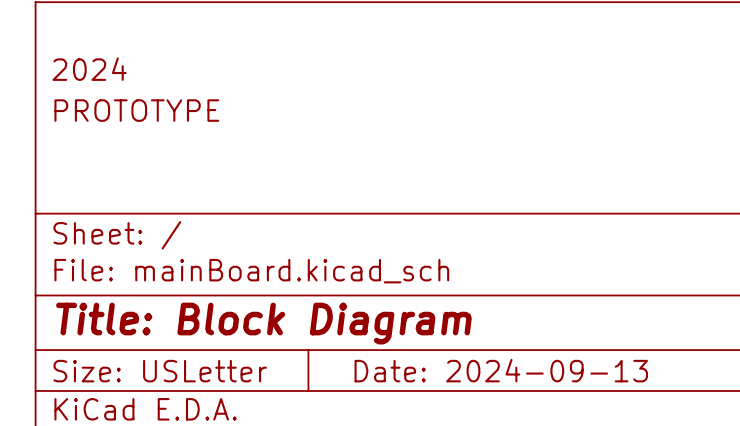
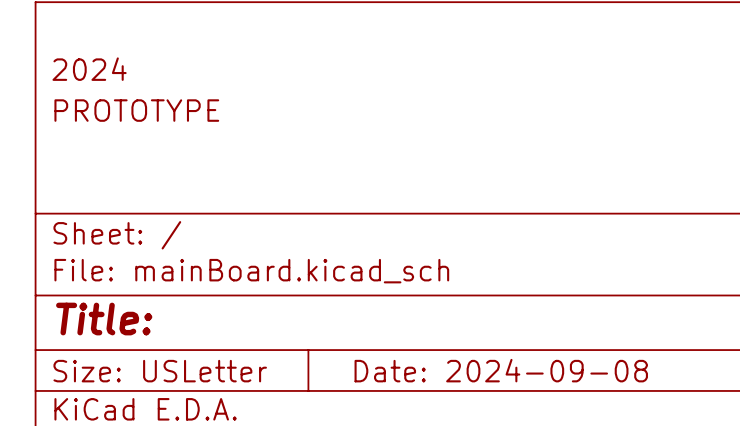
title block: Title: Block Diagram (263, 323) -> Title: (104, 319)
title block: Date: 2024-09-13 (501, 370) -> Date: 2024-09-08 (501, 370)

